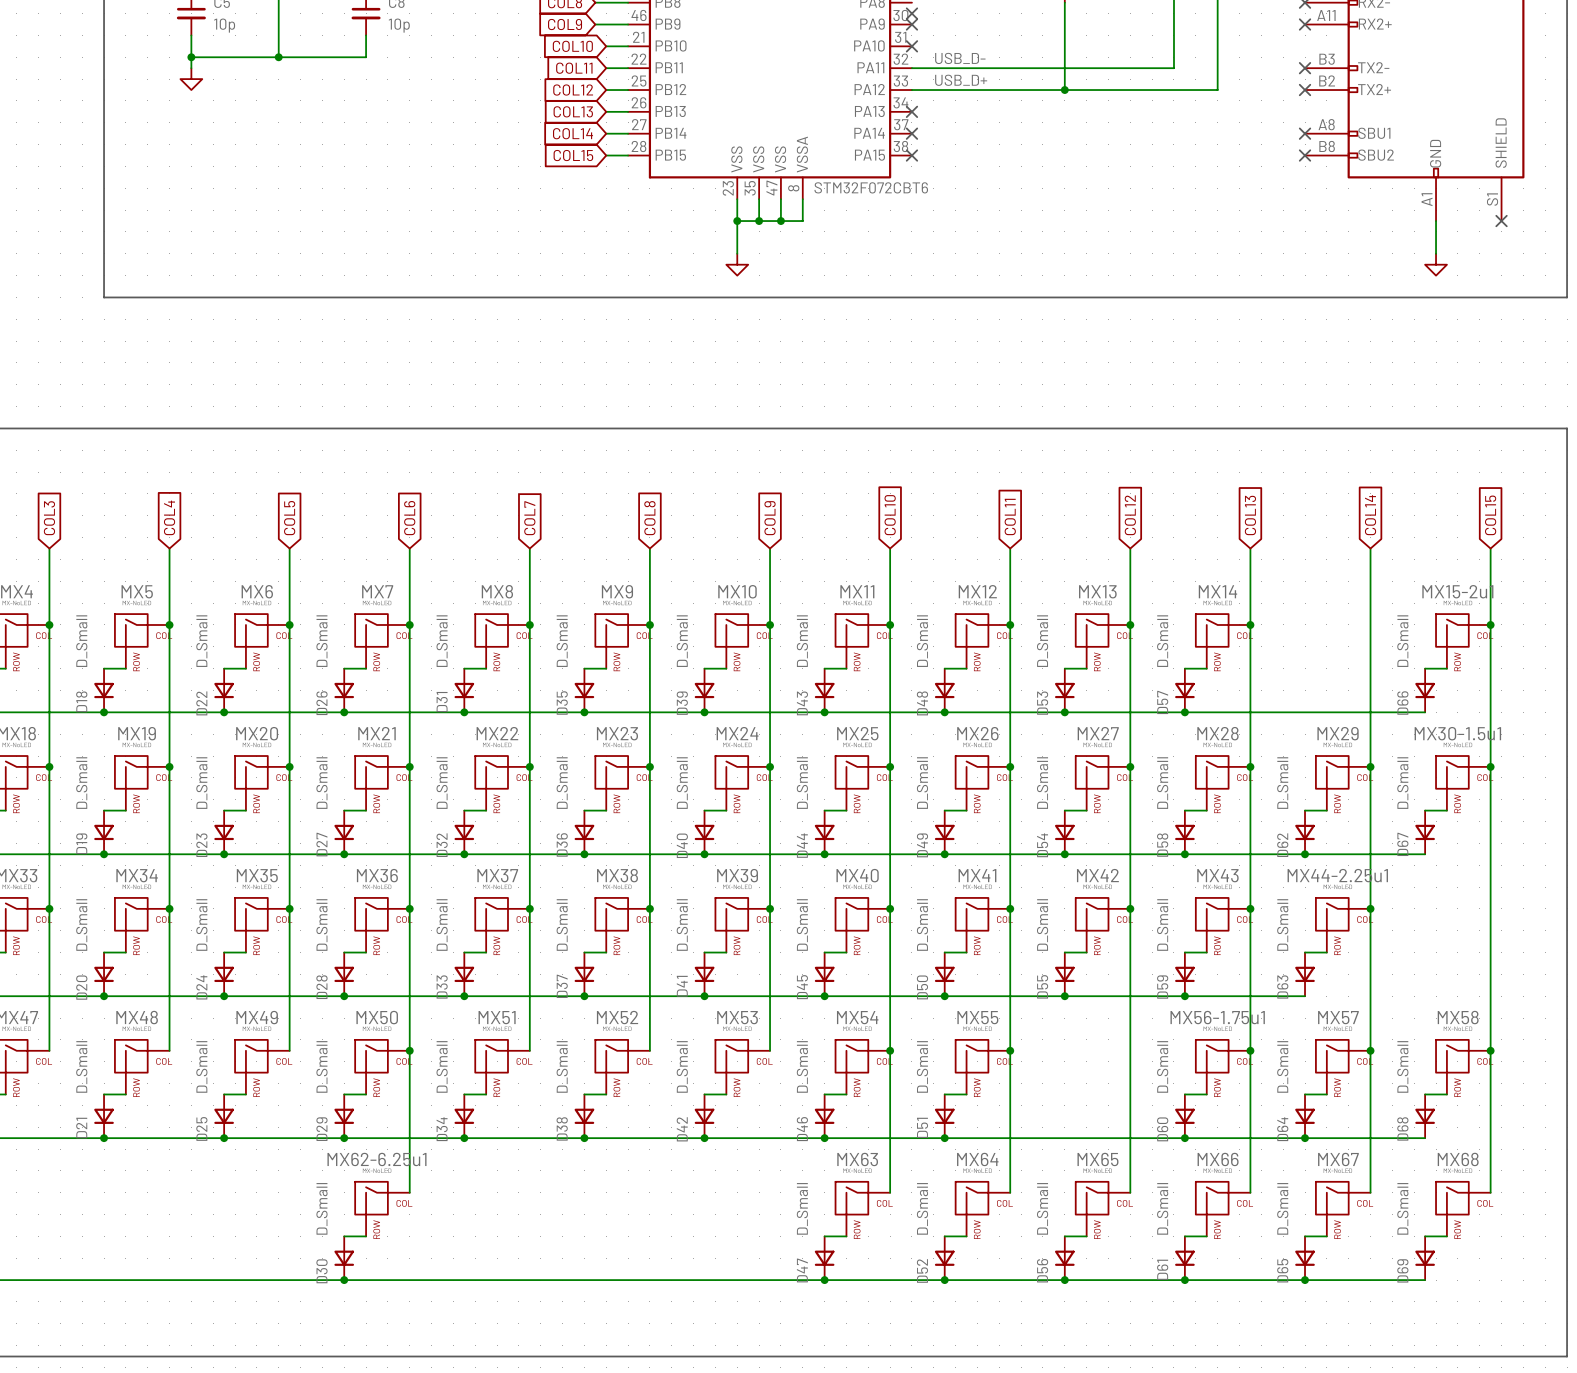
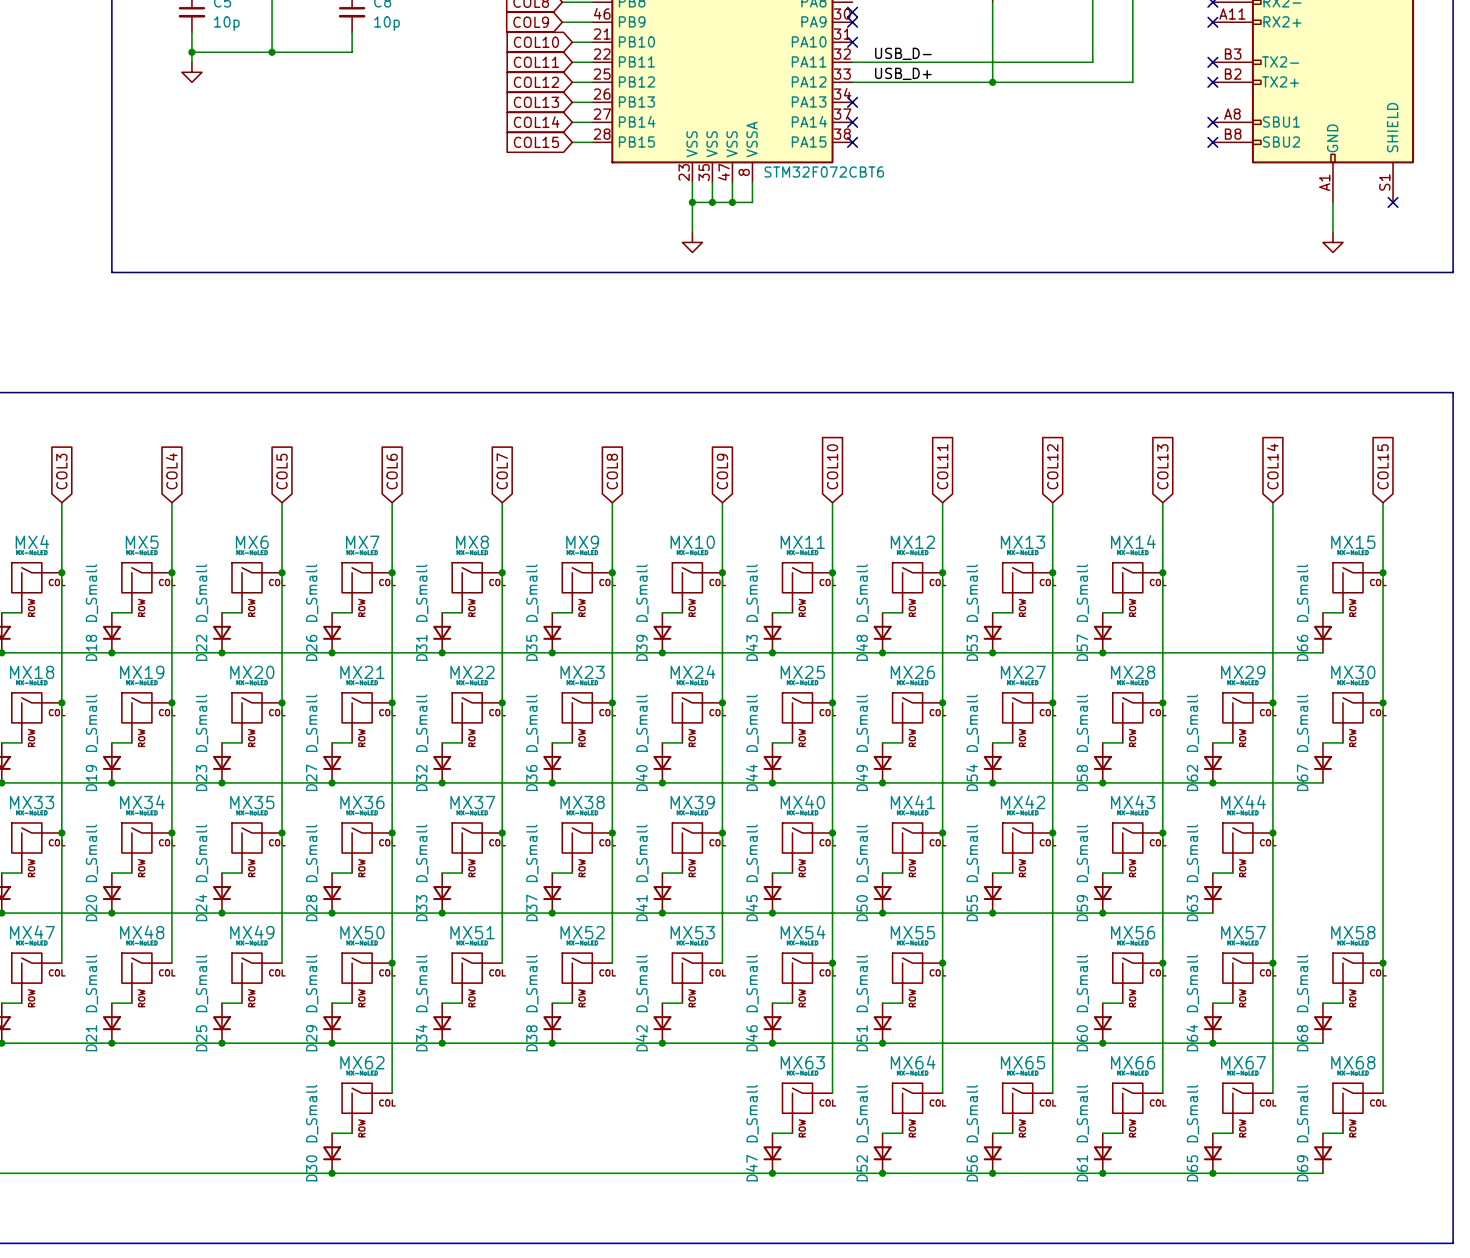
MX15-2u1 name: MX15-2u1 (1457, 591) -> MX15 (1353, 542)
MX30-1.5u1 name: MX30-1.5u1 (1457, 733) -> MX30 (1353, 672)
MX44-2.25u1 name: MX44-2.25u1 (1337, 875) -> MX44 (1243, 802)
MX56-1.75u1 name: MX56-1.75u1 (1217, 1017) -> MX56 (1133, 932)
MX62-6.25u1 name: MX62-6.25u1 (376, 1159) -> MX62 (362, 1062)

